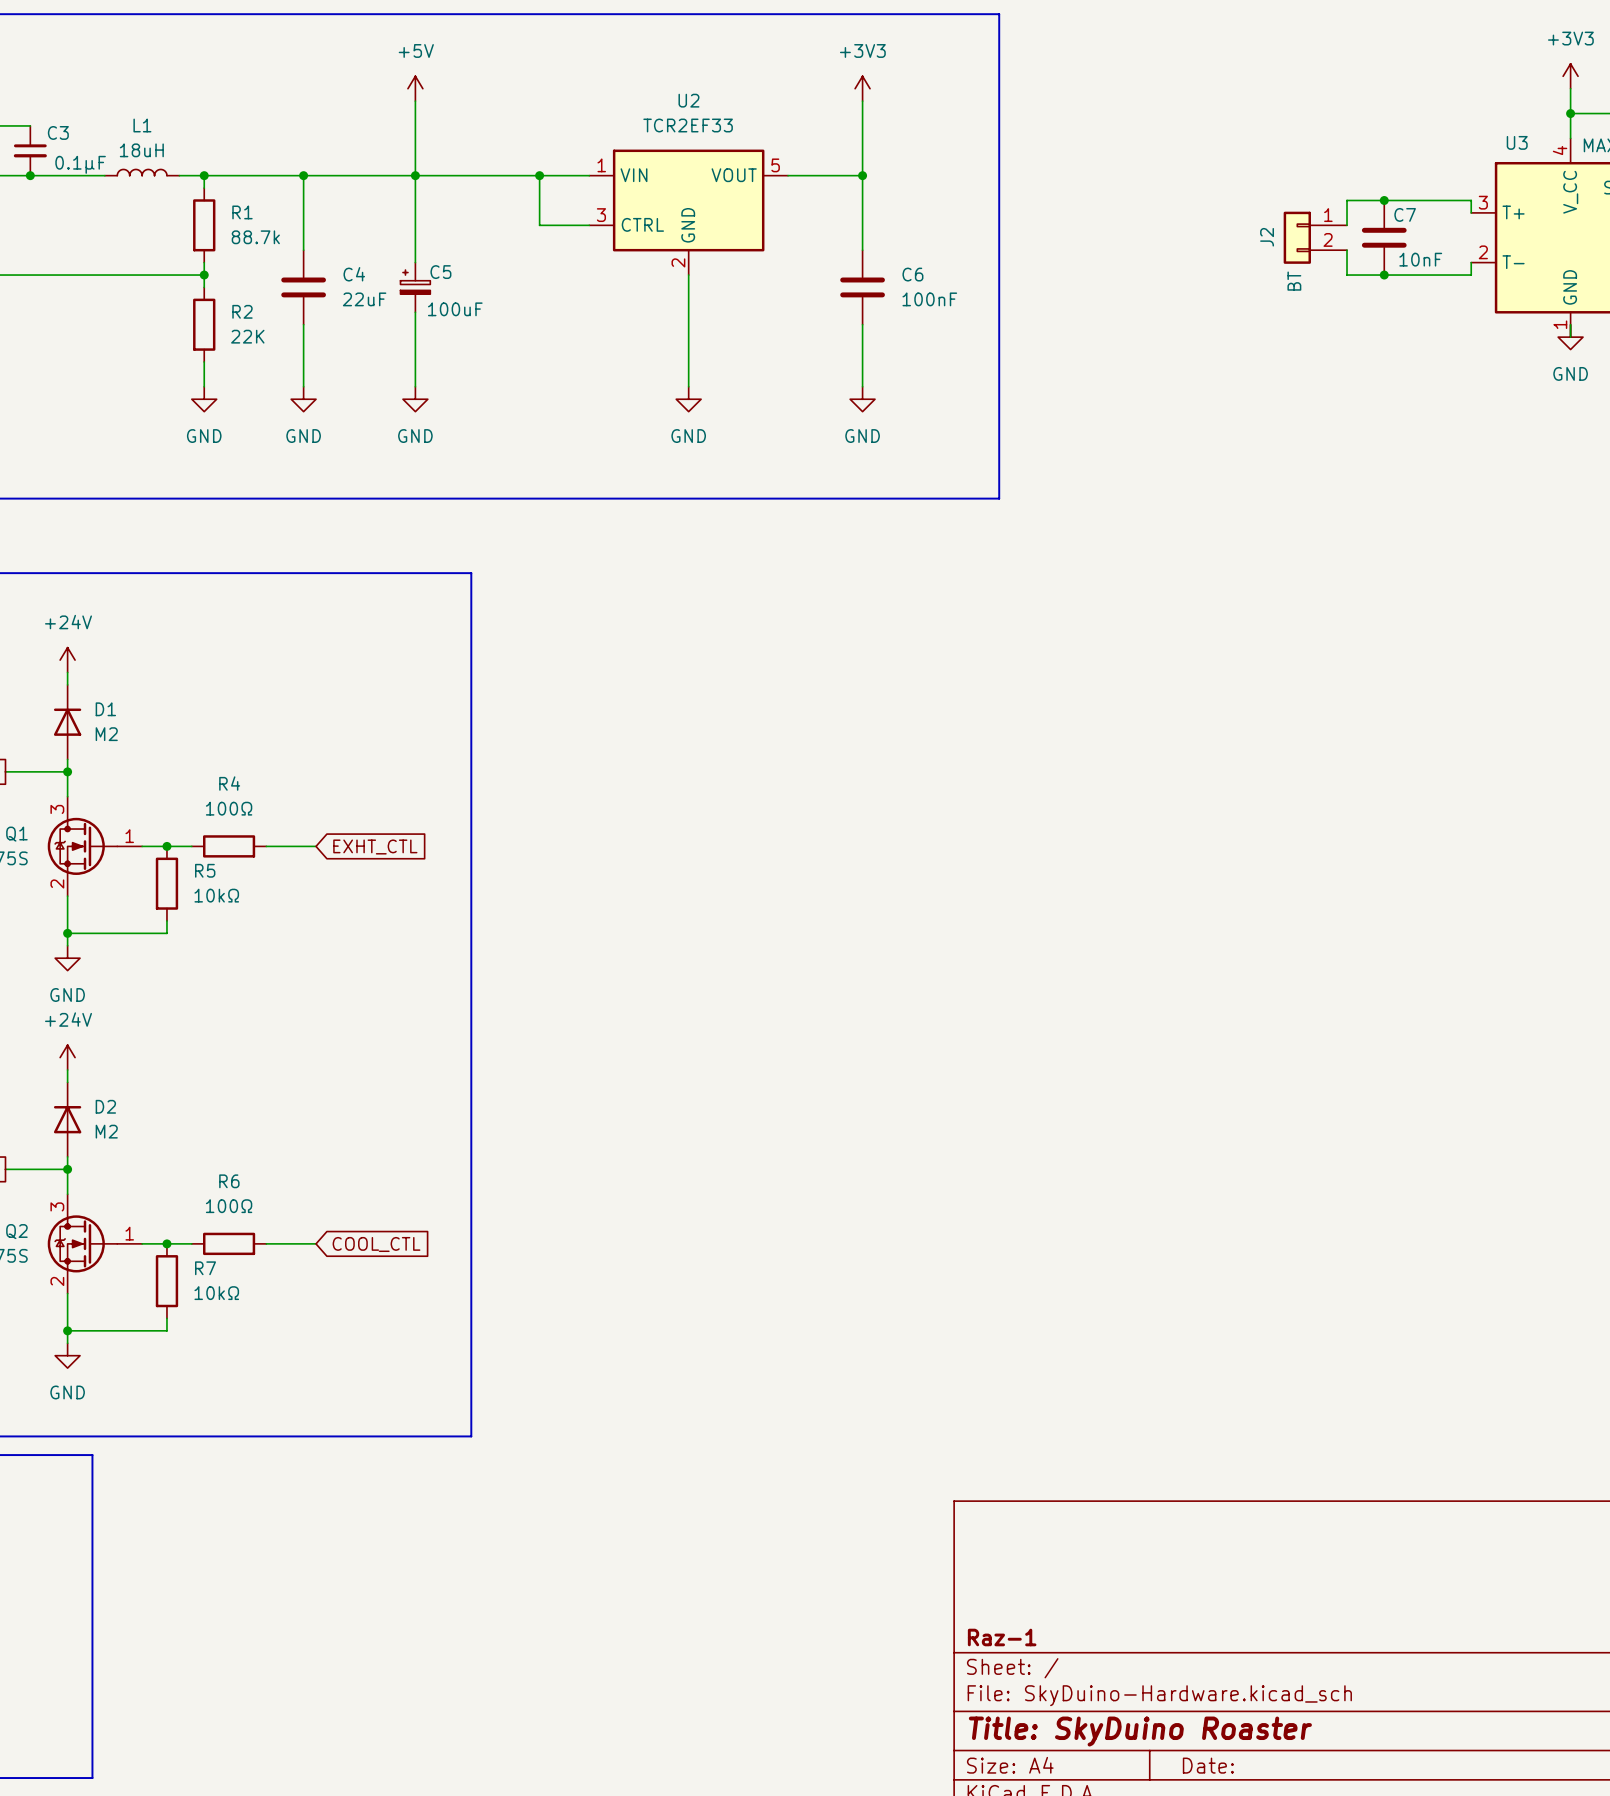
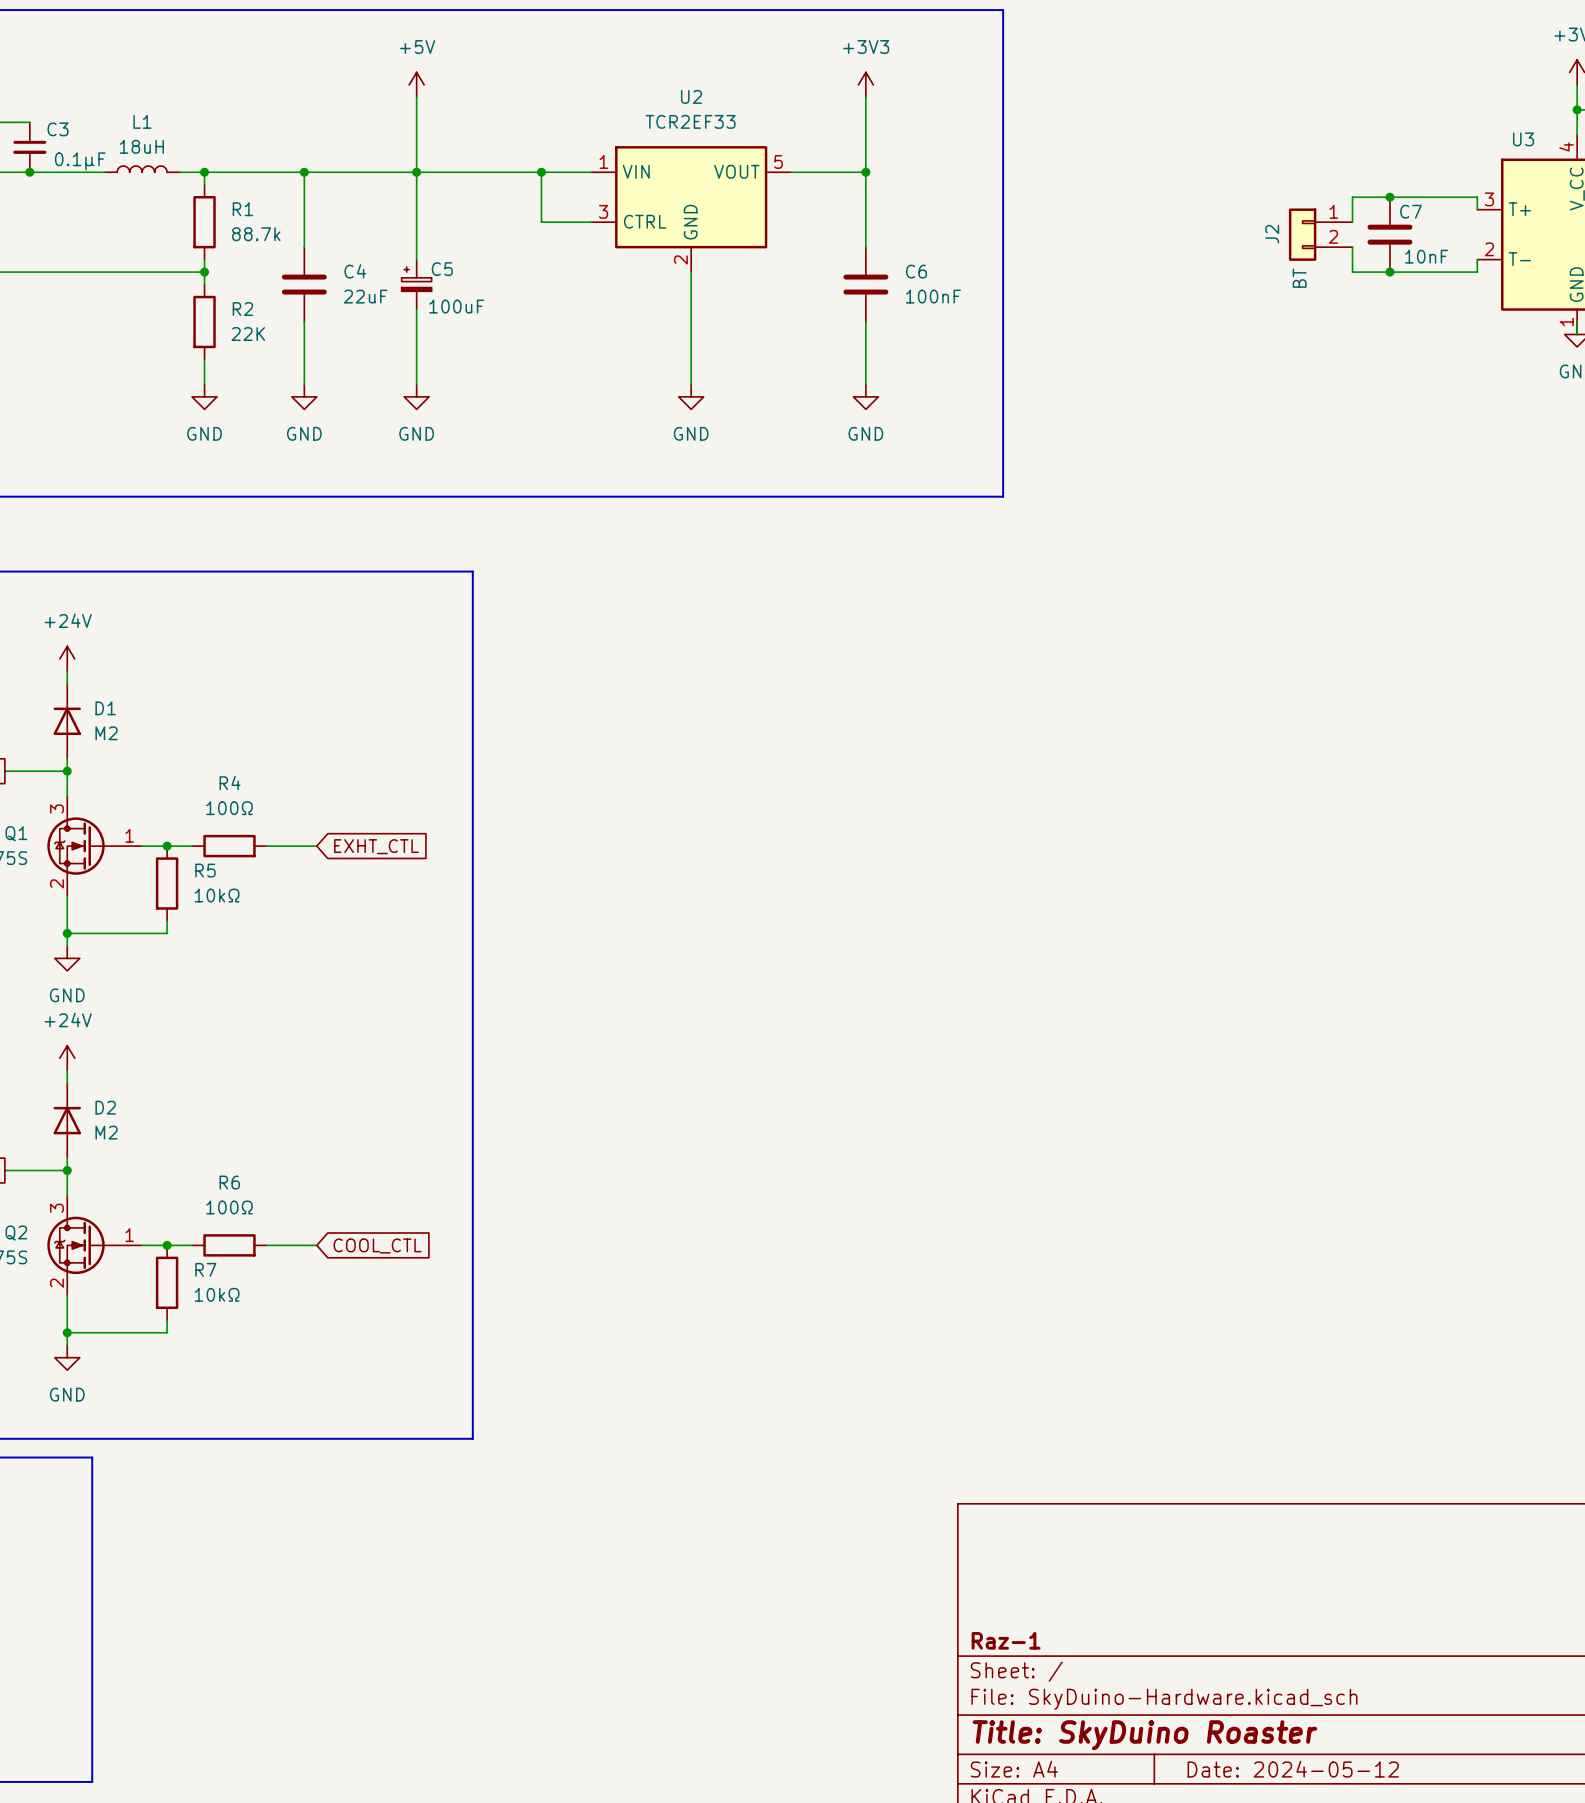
title block: Date: (1208, 1765) -> Date: 2024-05-12 (1293, 1769)

